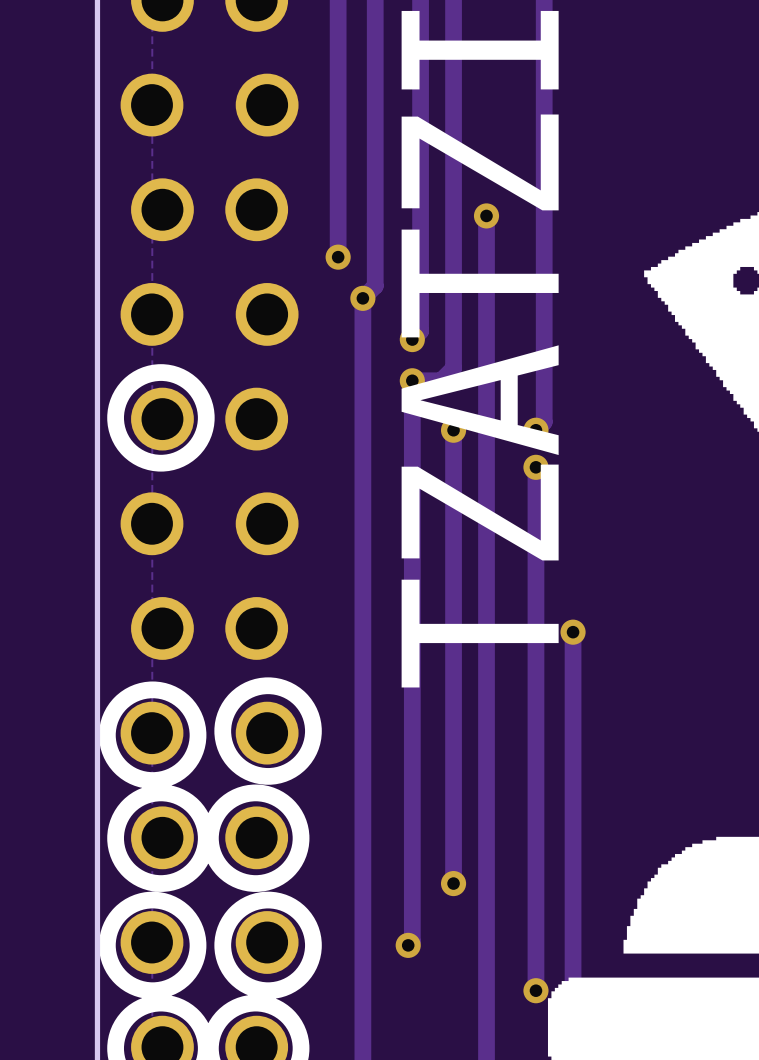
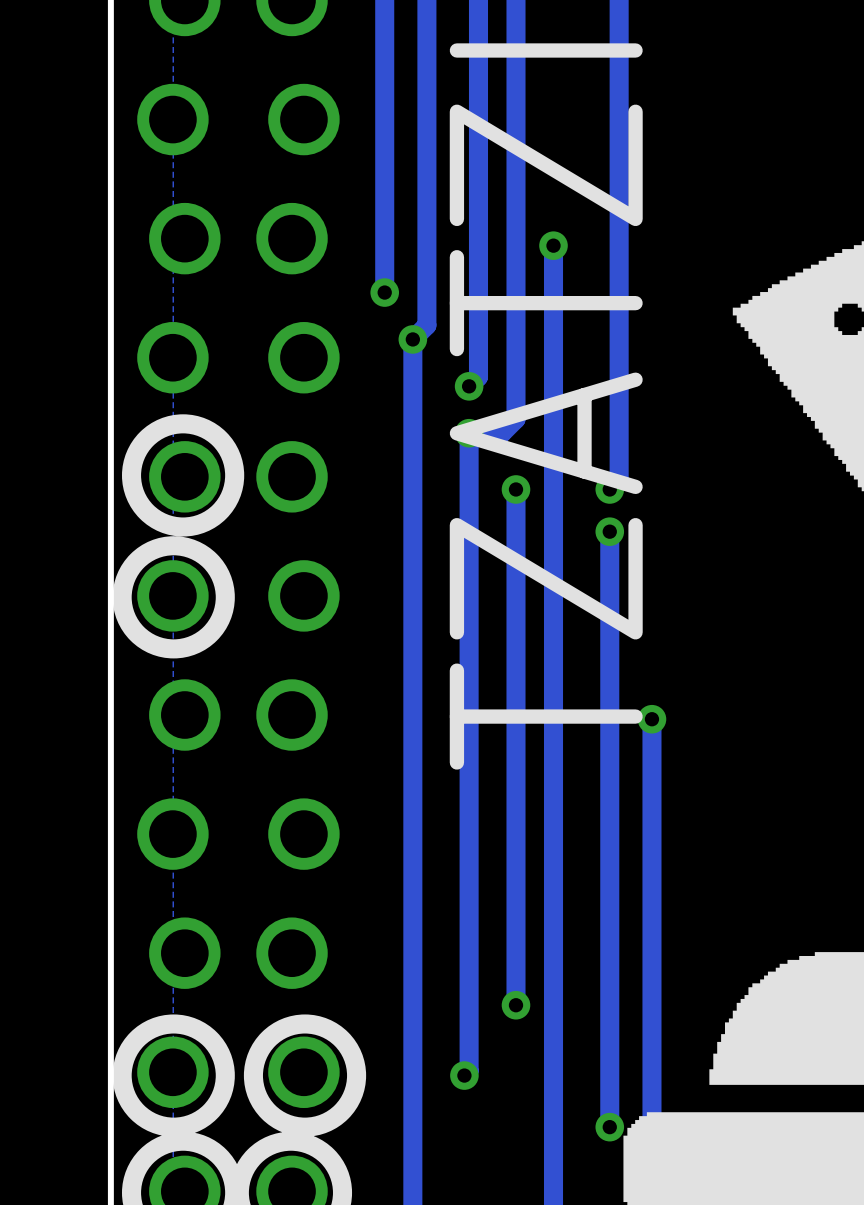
drawing: none -> [112, 536, 235, 659]
drawing: [98, 677, 322, 892] -> none

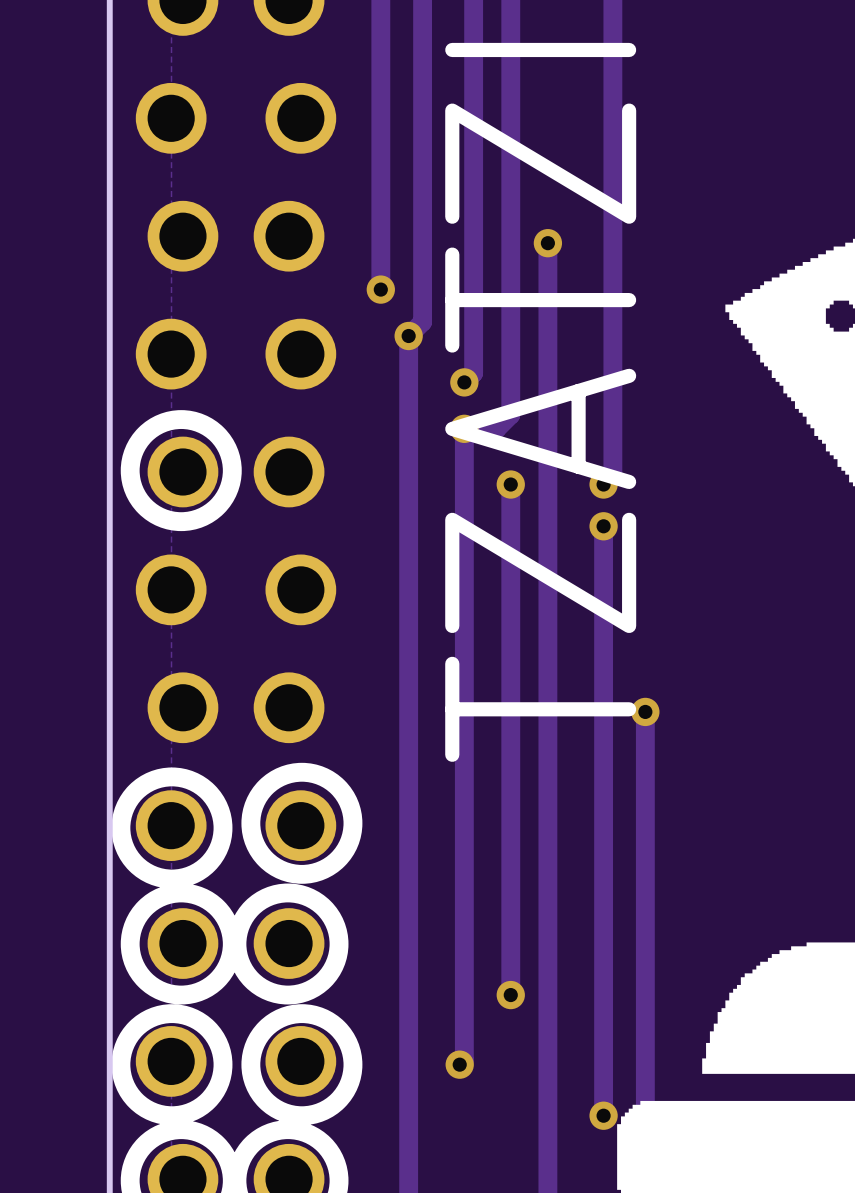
drawing: [112, 536, 235, 659] -> none
drawing: none -> [111, 762, 363, 1005]

